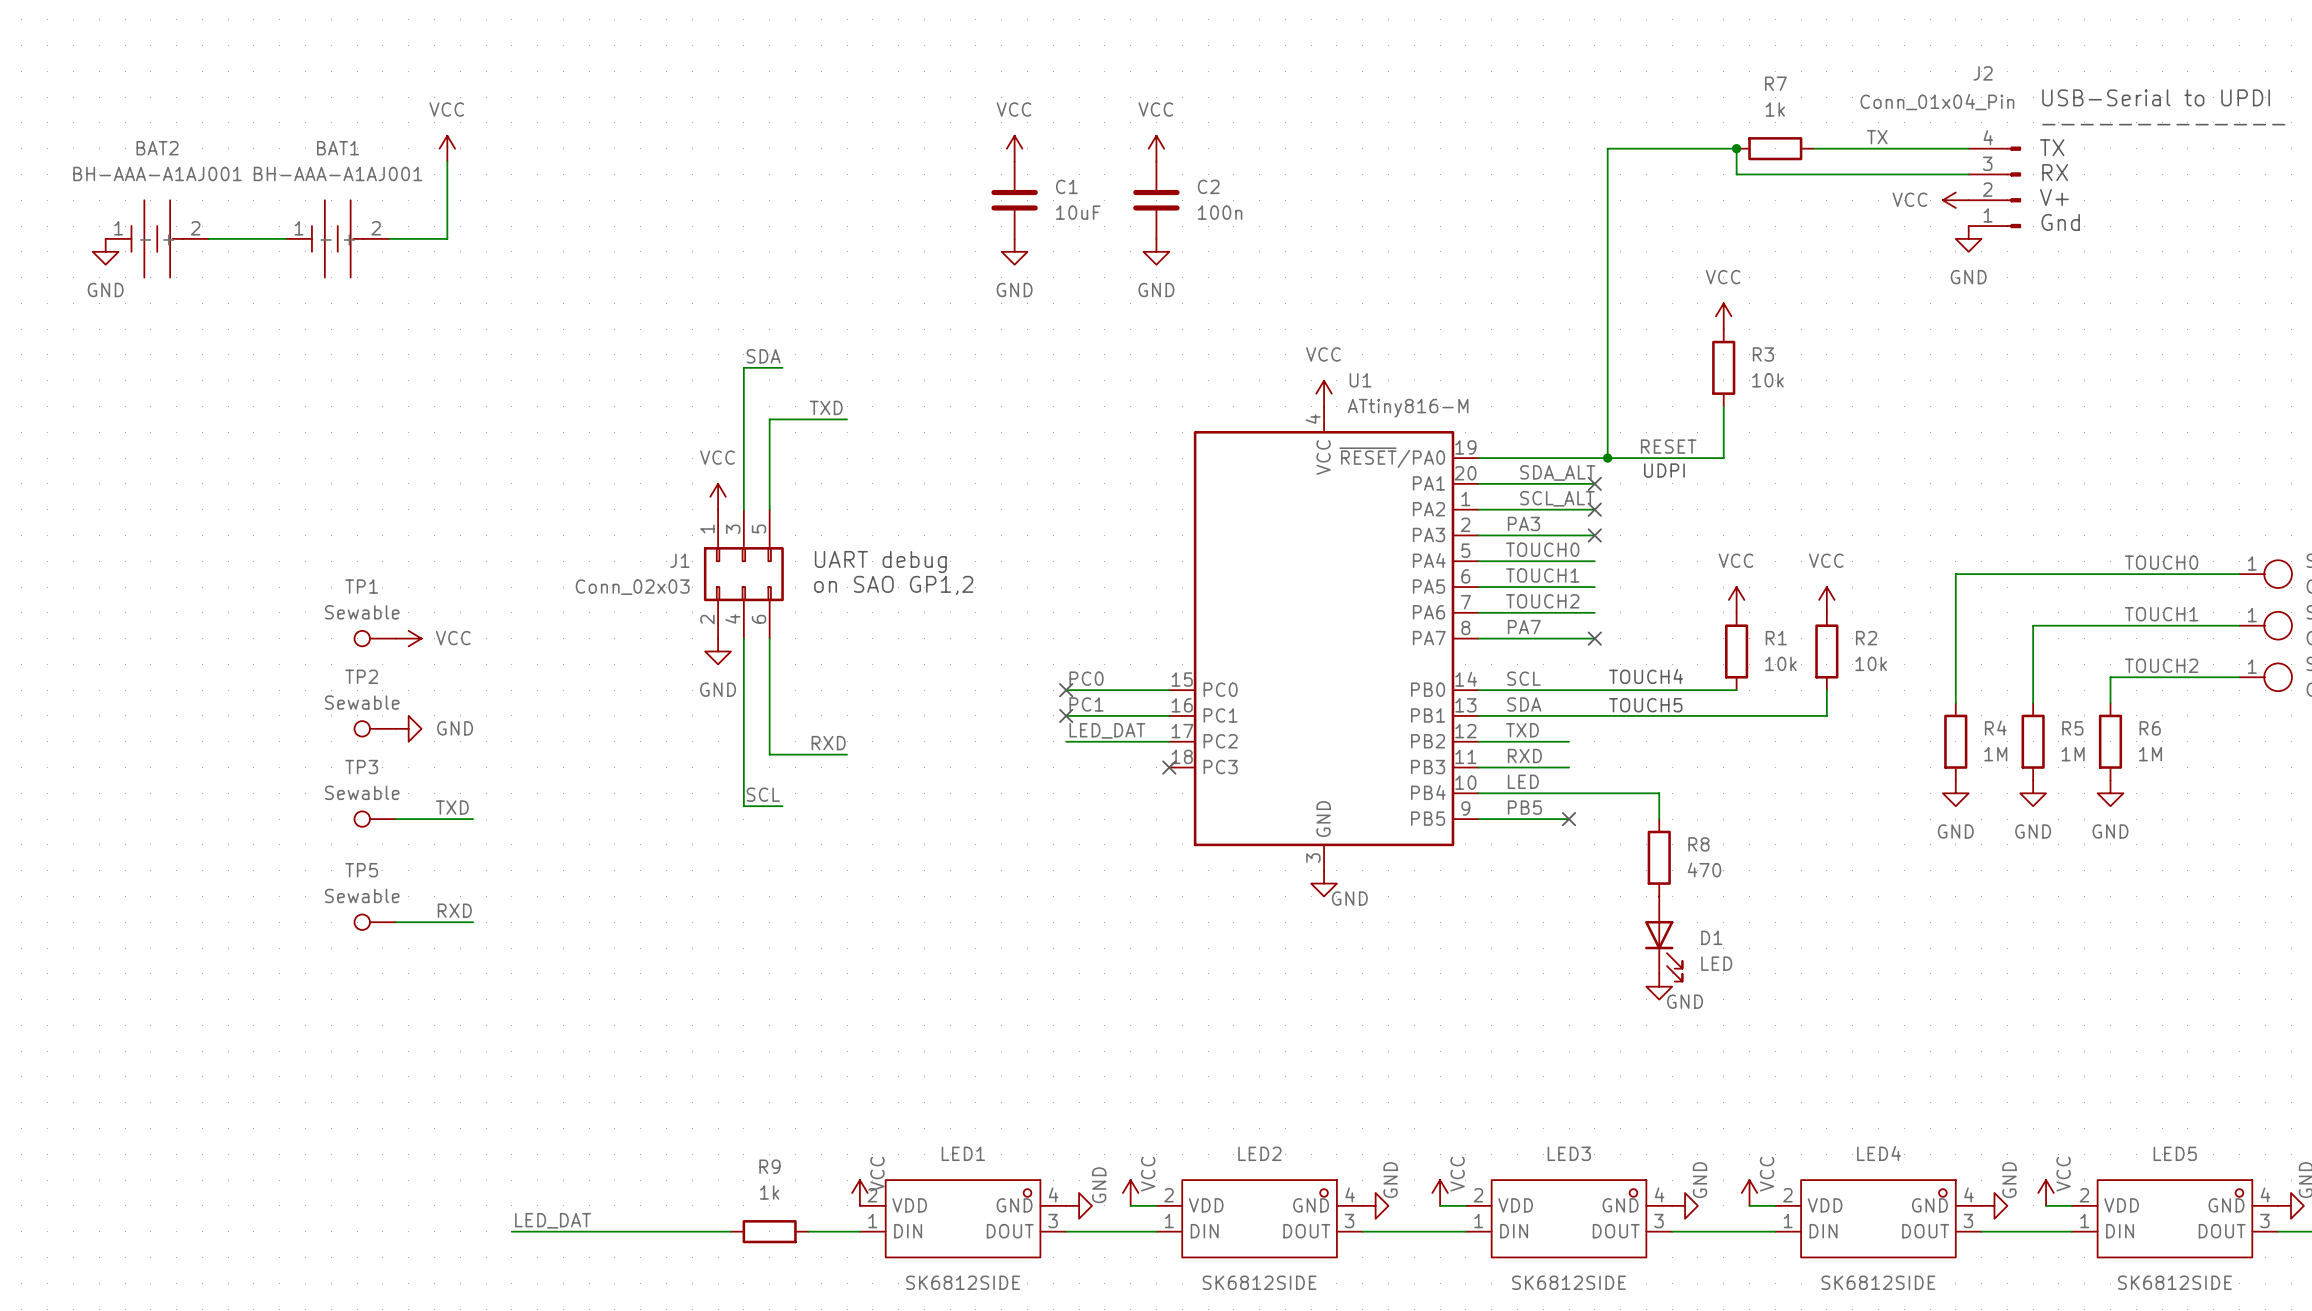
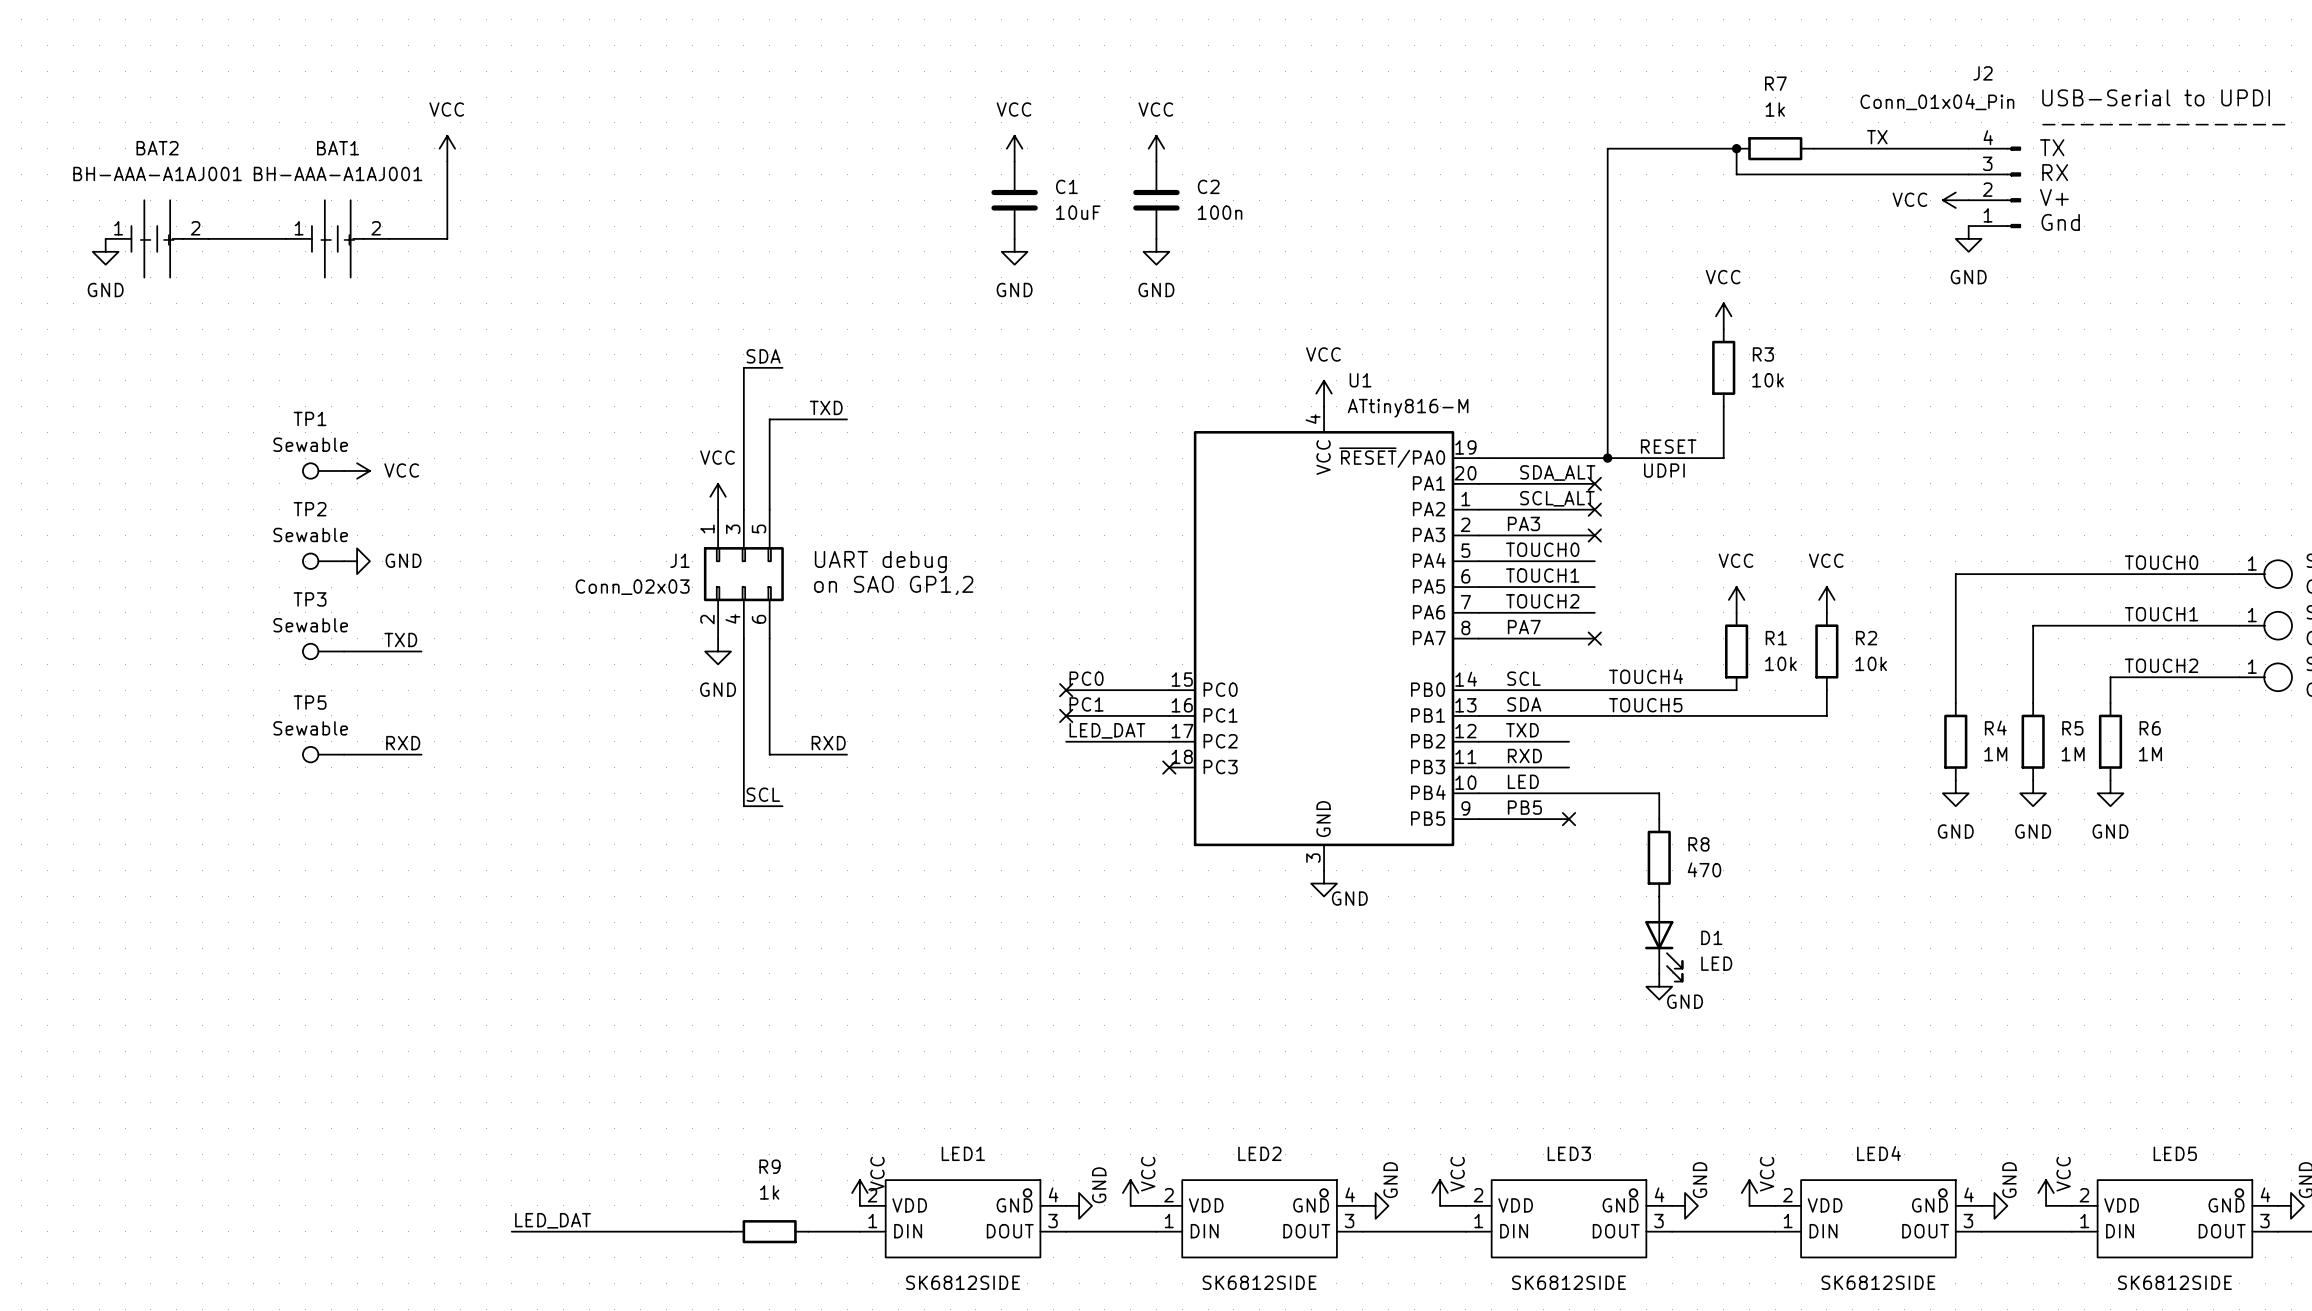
TP1 position: (375, 638) -> (323, 470)
power symbol position: VCC (408, 638) -> VCC (357, 470)
wire: none -> (344, 651) (421, 651)
TP2 position: (375, 728) -> (323, 561)
power symbol position: GND (408, 728) -> GND (357, 561)
label position: TXD (452, 807) -> TXD (400, 639)
TP3 position: (375, 819) -> (323, 651)
wire: (395, 819) (473, 819) -> (344, 754) (421, 754)
label position: RXD (454, 910) -> RXD (403, 743)
TP5 position: (375, 922) -> (323, 754)
wire: (395, 922) (473, 922) -> none

